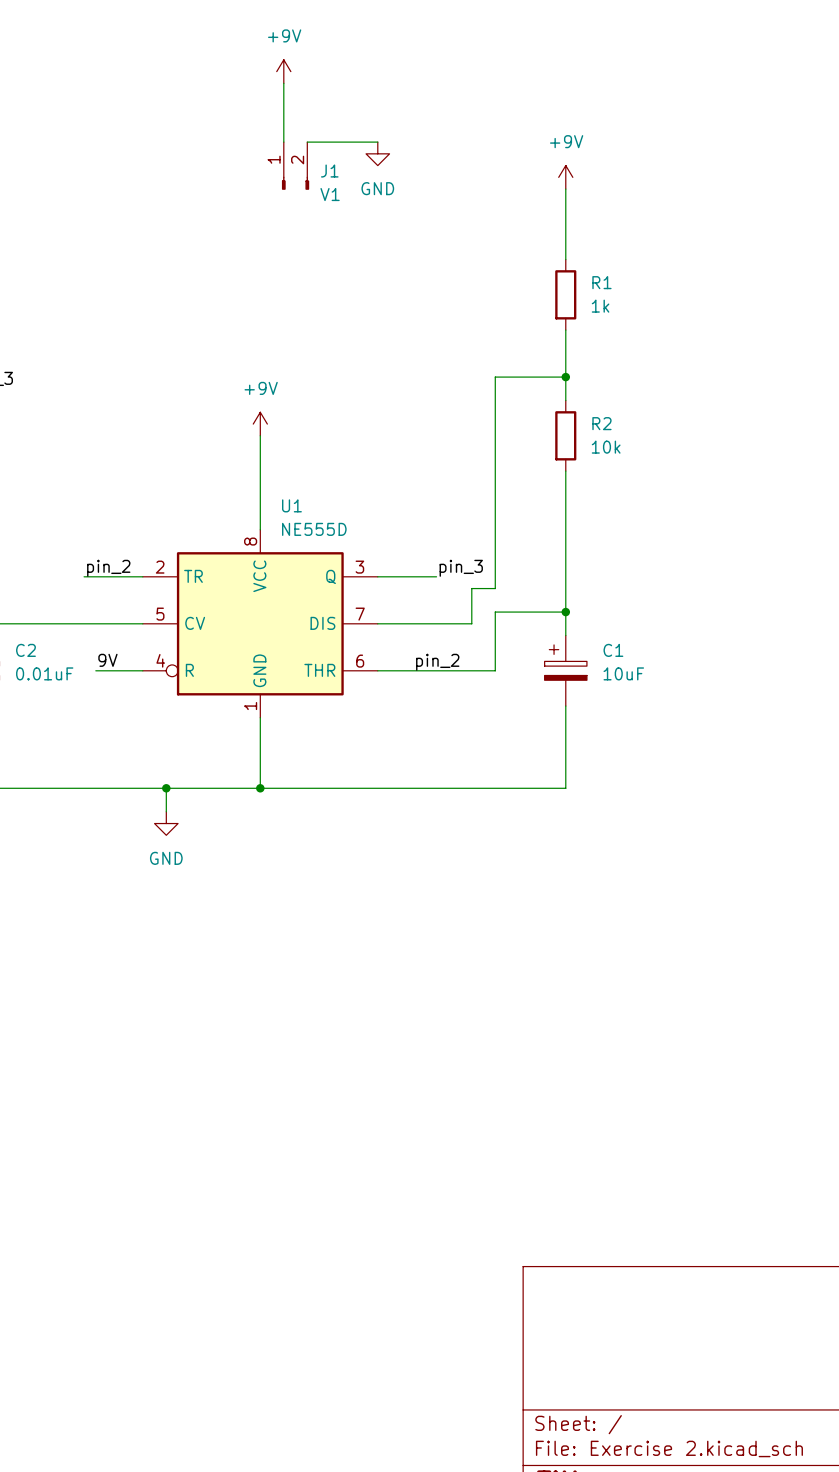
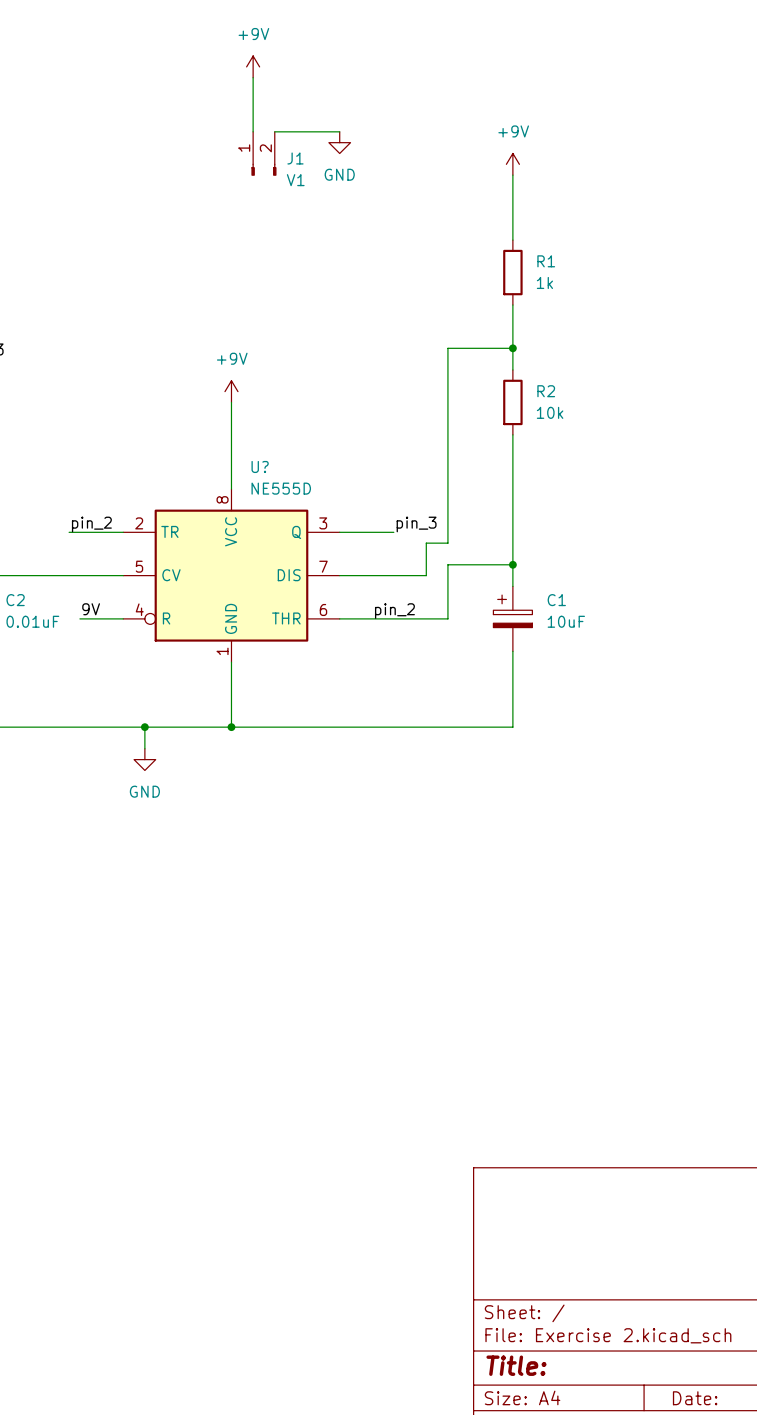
U1 name: U1 (291, 505) -> U? (260, 466)

